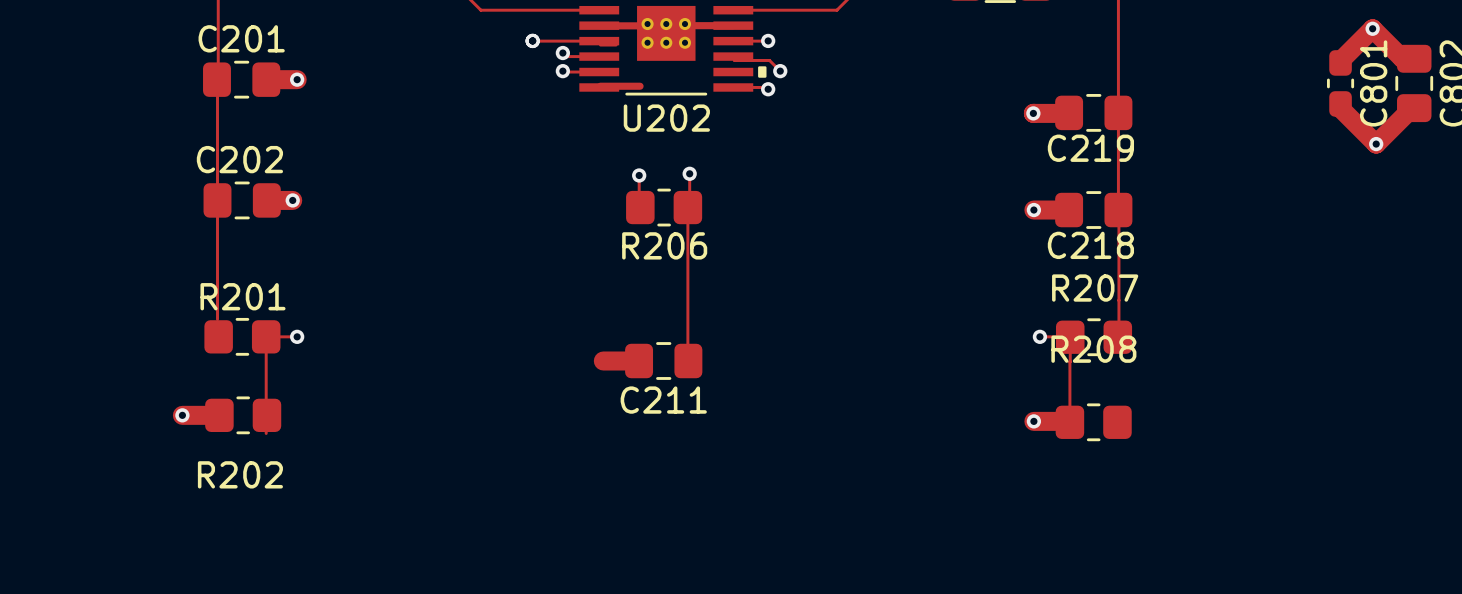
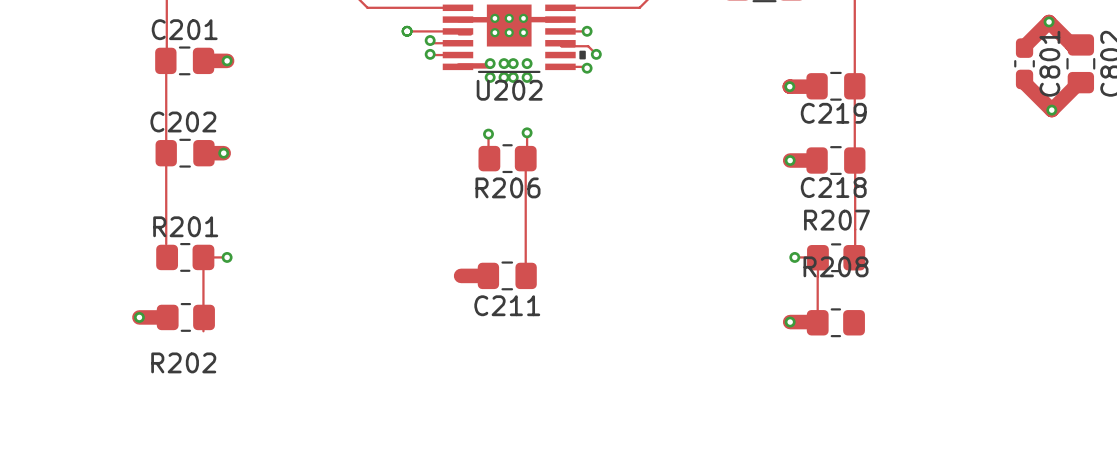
via: none -> (490, 63)
via: none -> (504, 63)
via: none -> (513, 63)
via: none -> (527, 63)
via: none -> (490, 77)
via: none -> (504, 77)
via: none -> (513, 77)
via: none -> (527, 77)

